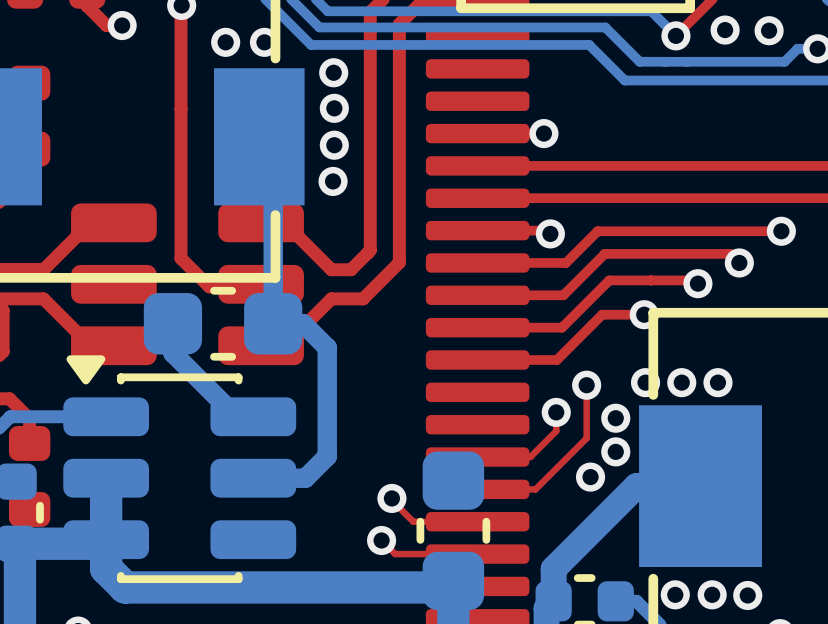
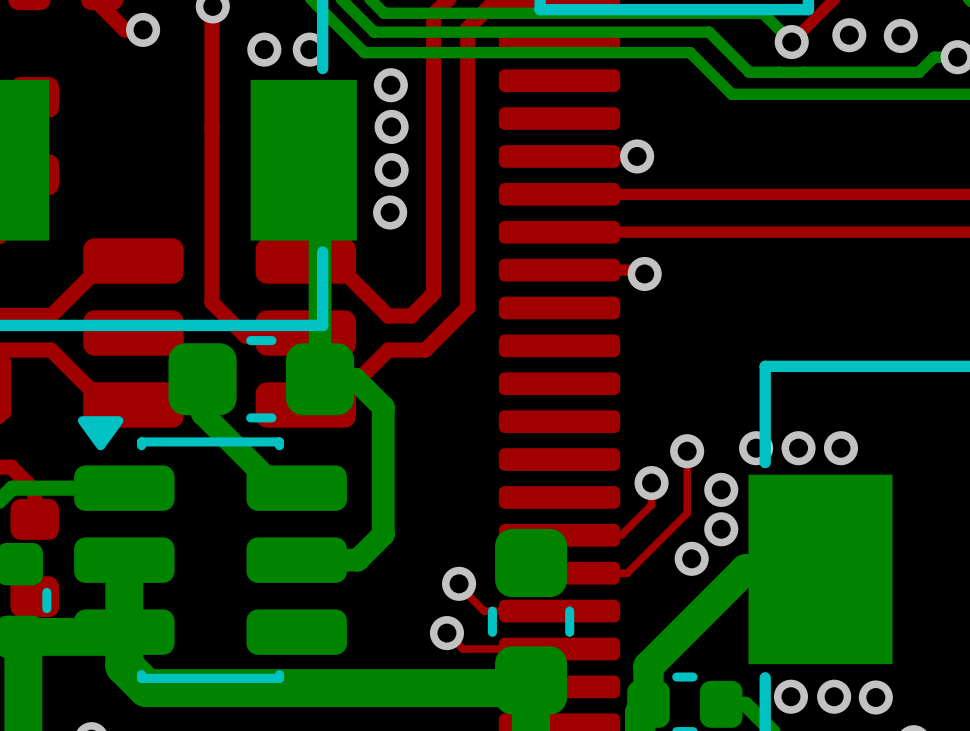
top track: (781, 231) (597, 231) (565, 262) (477, 262) -> none
via: (781, 231) -> none
top track: (739, 262) (730, 253) (604, 253) (563, 295) (477, 295) -> none
via: (739, 262) -> none
top track: (697, 283) (694, 280) (609, 280) (562, 327) (477, 327) -> none
via: (697, 283) -> none
top track: (644, 314) (602, 314) (556, 360) (477, 360) -> none
via: (644, 314) -> none

